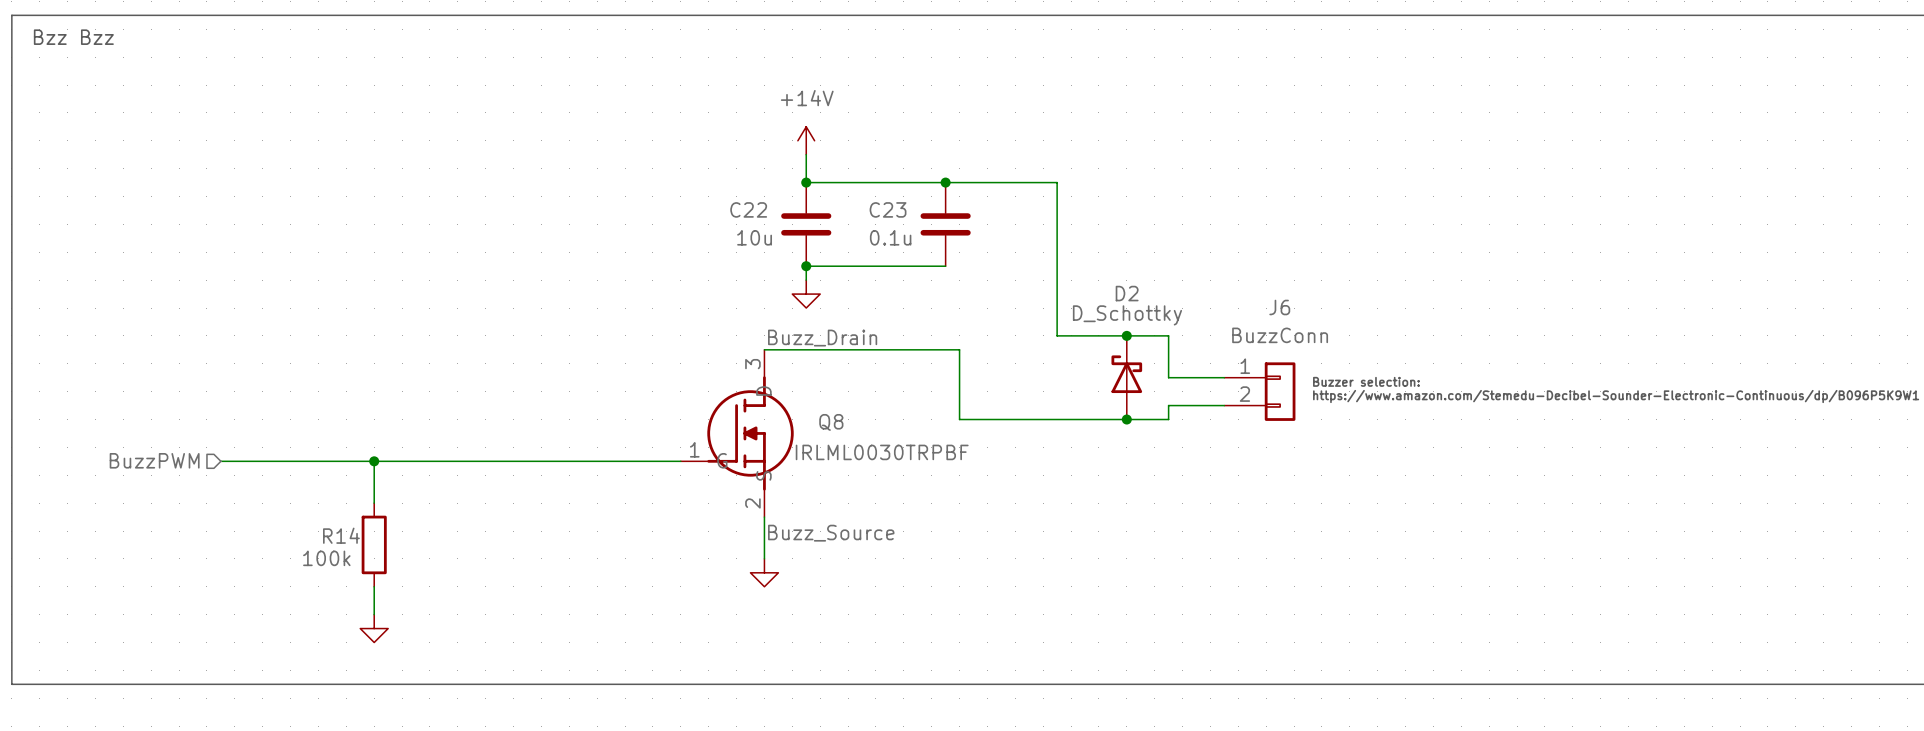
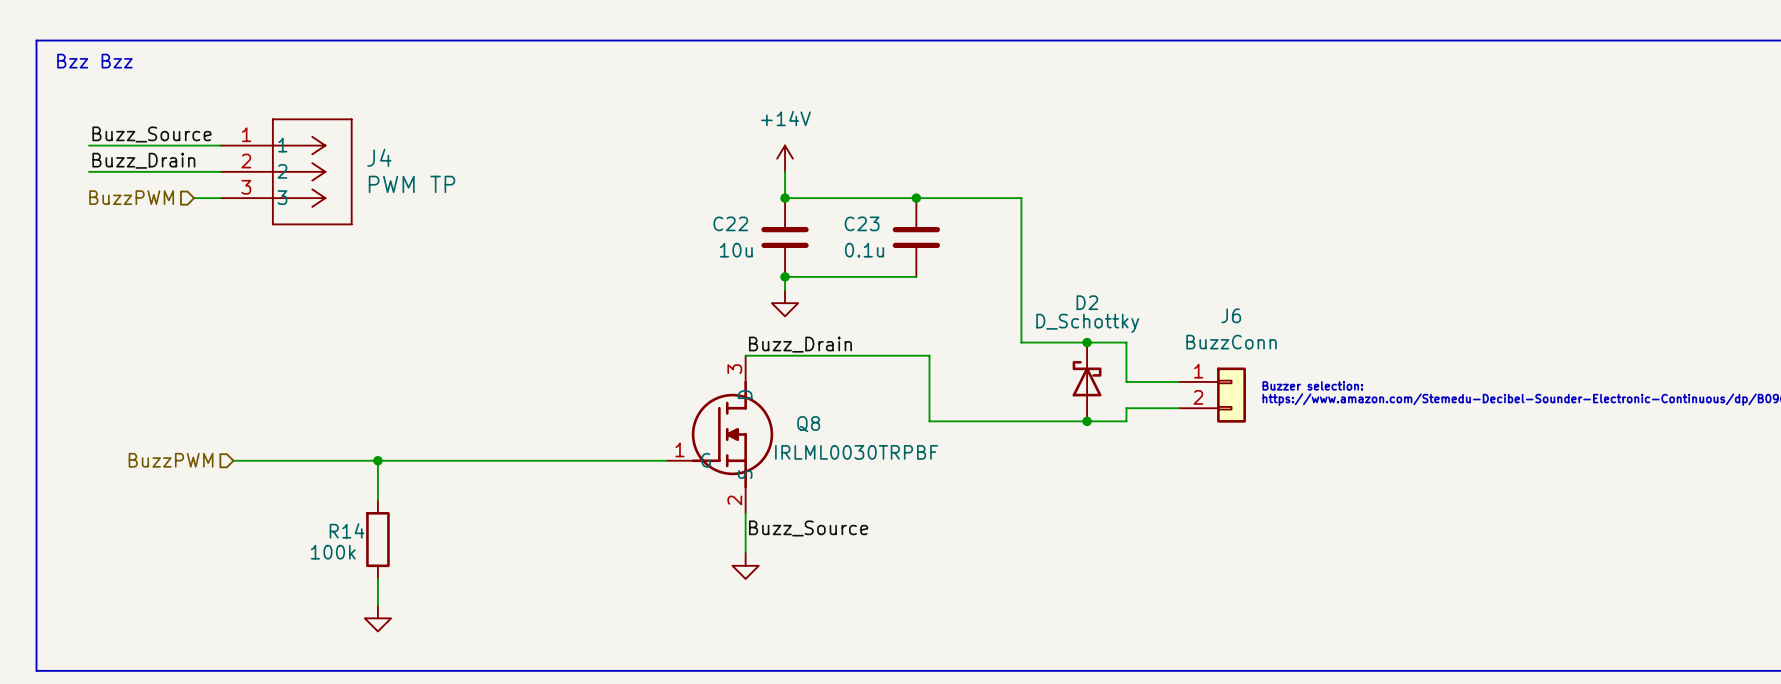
label: none -> Buzz_Source (151, 134)
wire: none -> (89, 145) (220, 145)
label: none -> Buzz_Drain (143, 160)
wire: none -> (89, 171) (220, 171)
J4: none -> PWM TP (286, 171)
hierarchical label: none -> BuzzPWM (131, 197)
wire: none -> (194, 198) (220, 198)

